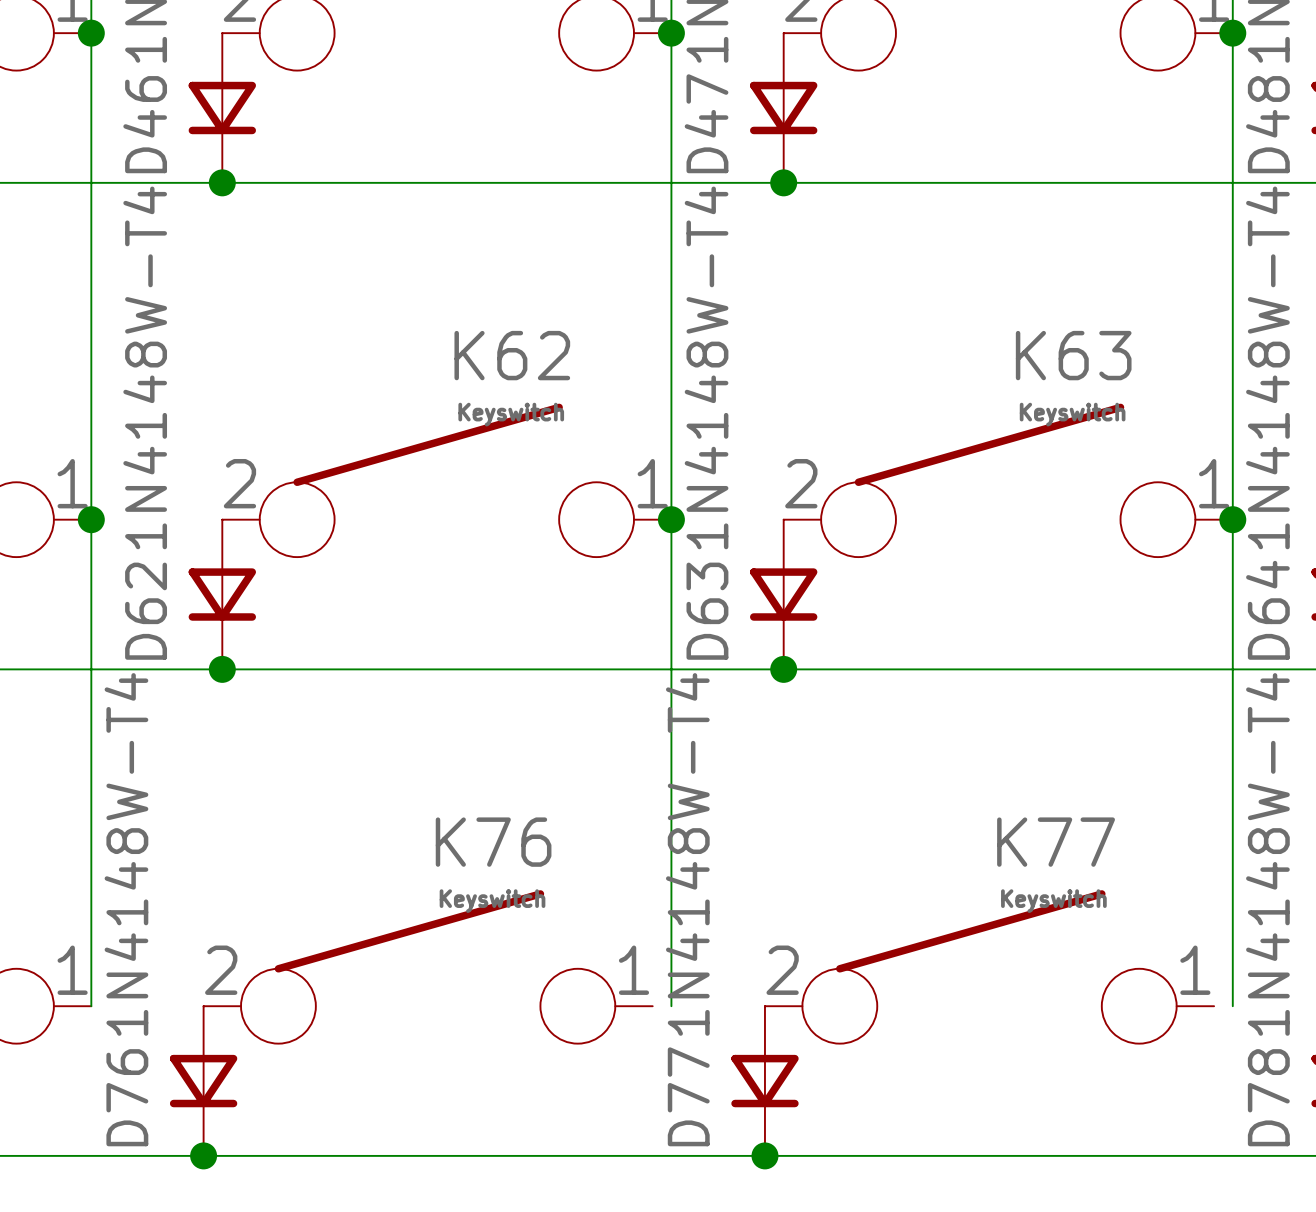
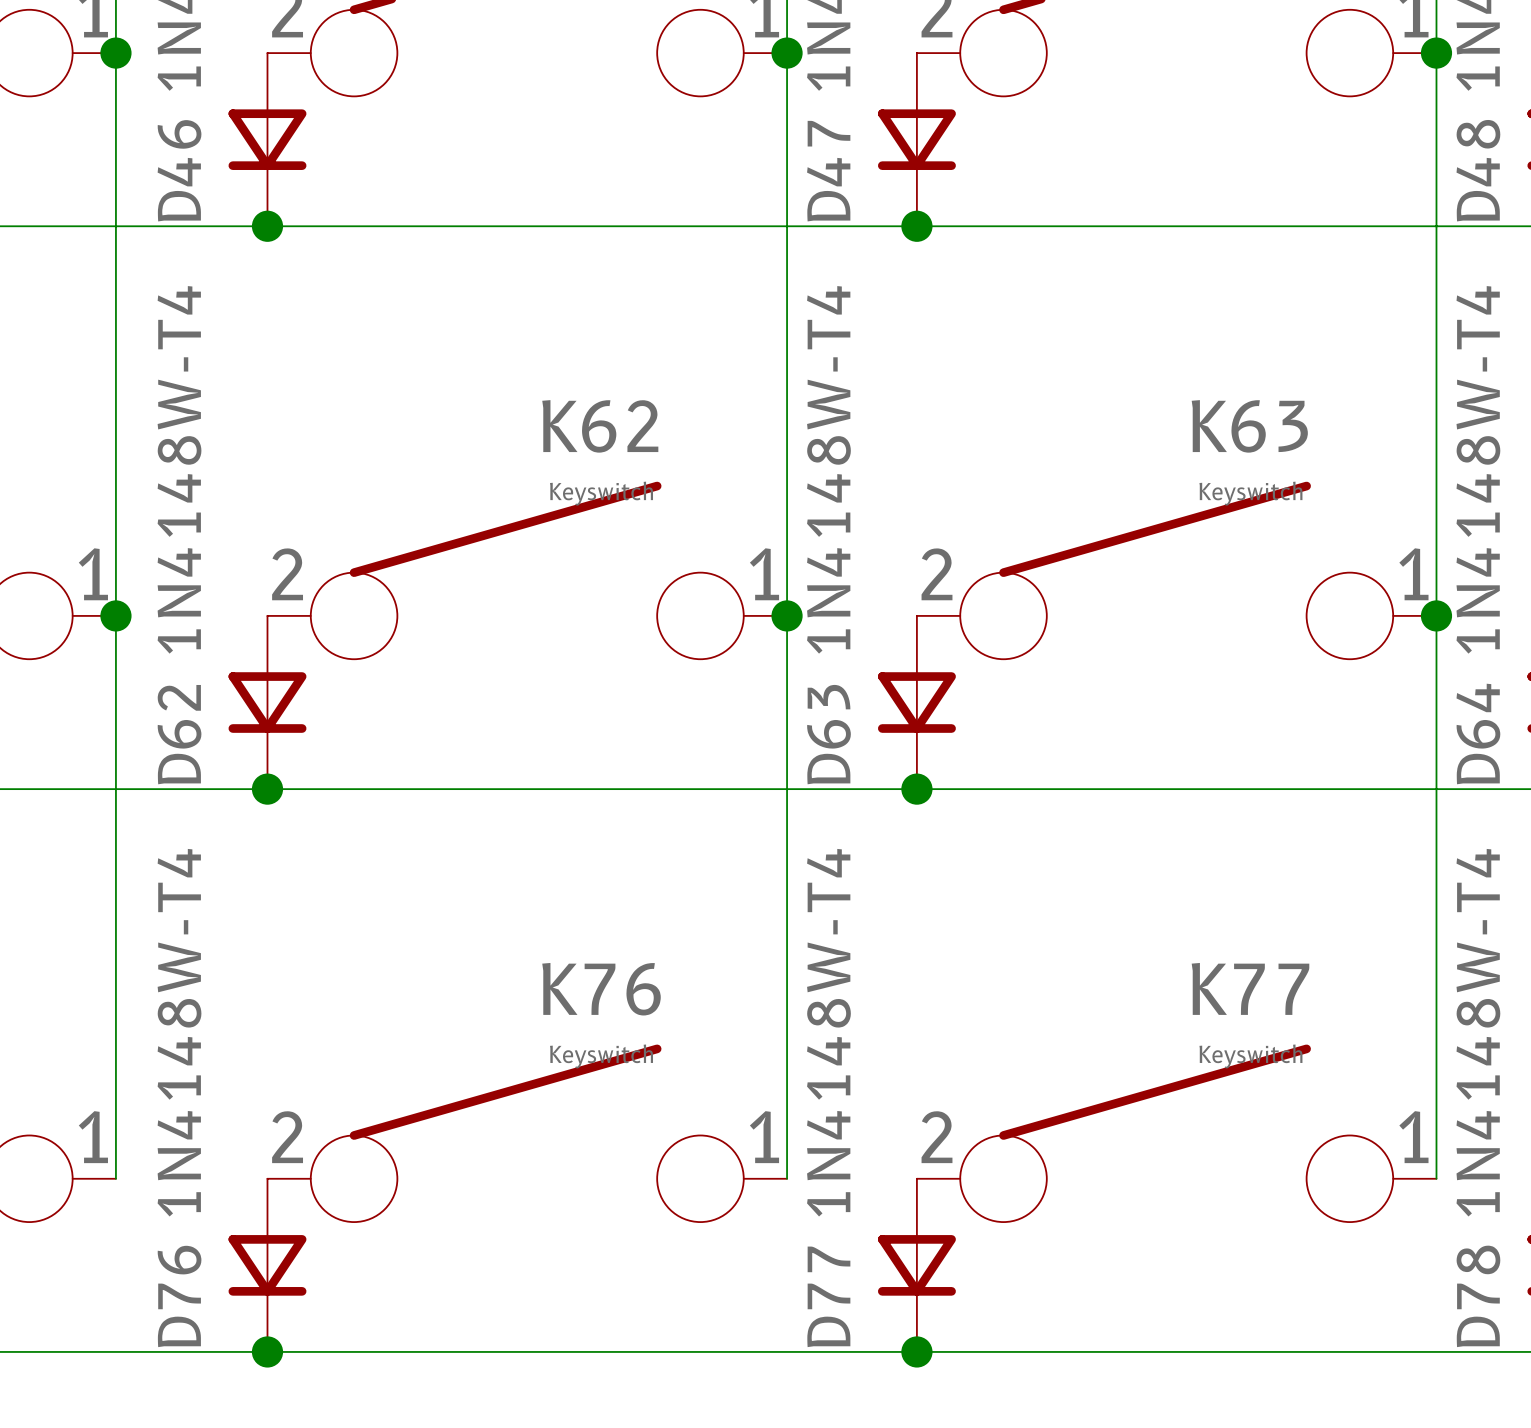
K76 position: (428, 966) -> (527, 1133)
K77 position: (989, 966) -> (1176, 1133)
D76 position: (203, 1081) -> (267, 1265)
D77 position: (764, 1081) -> (916, 1265)
junction position: (203, 1155) -> (267, 1351)
junction position: (764, 1155) -> (916, 1351)

